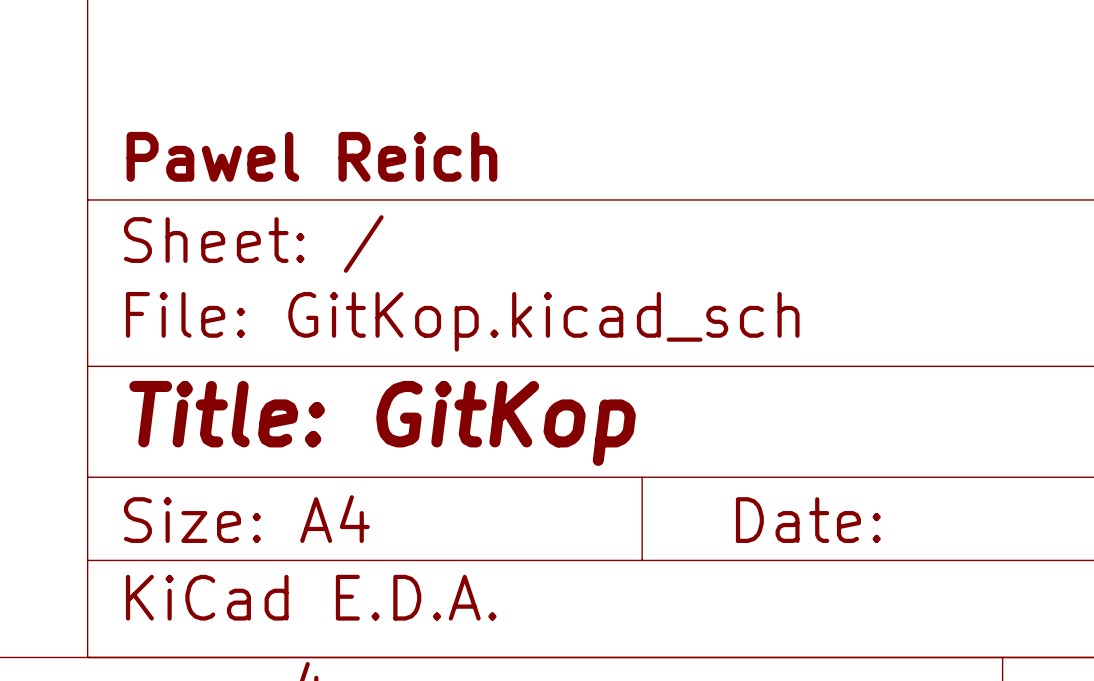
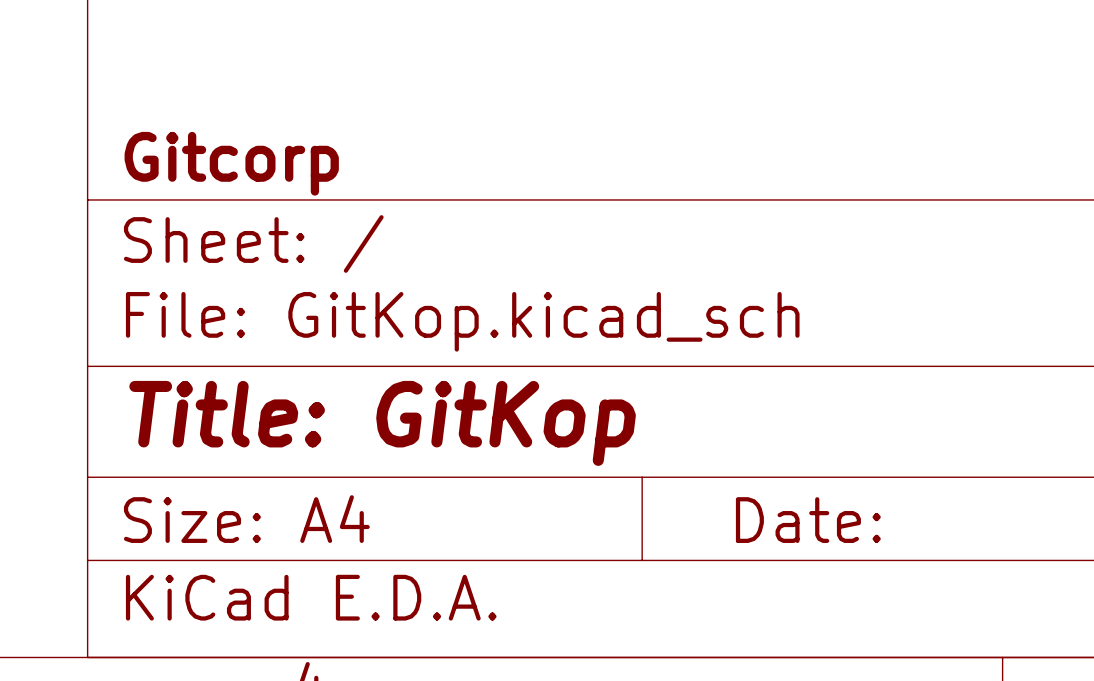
title block: Pawel Reich (311, 156) -> Gitcorp (231, 163)

